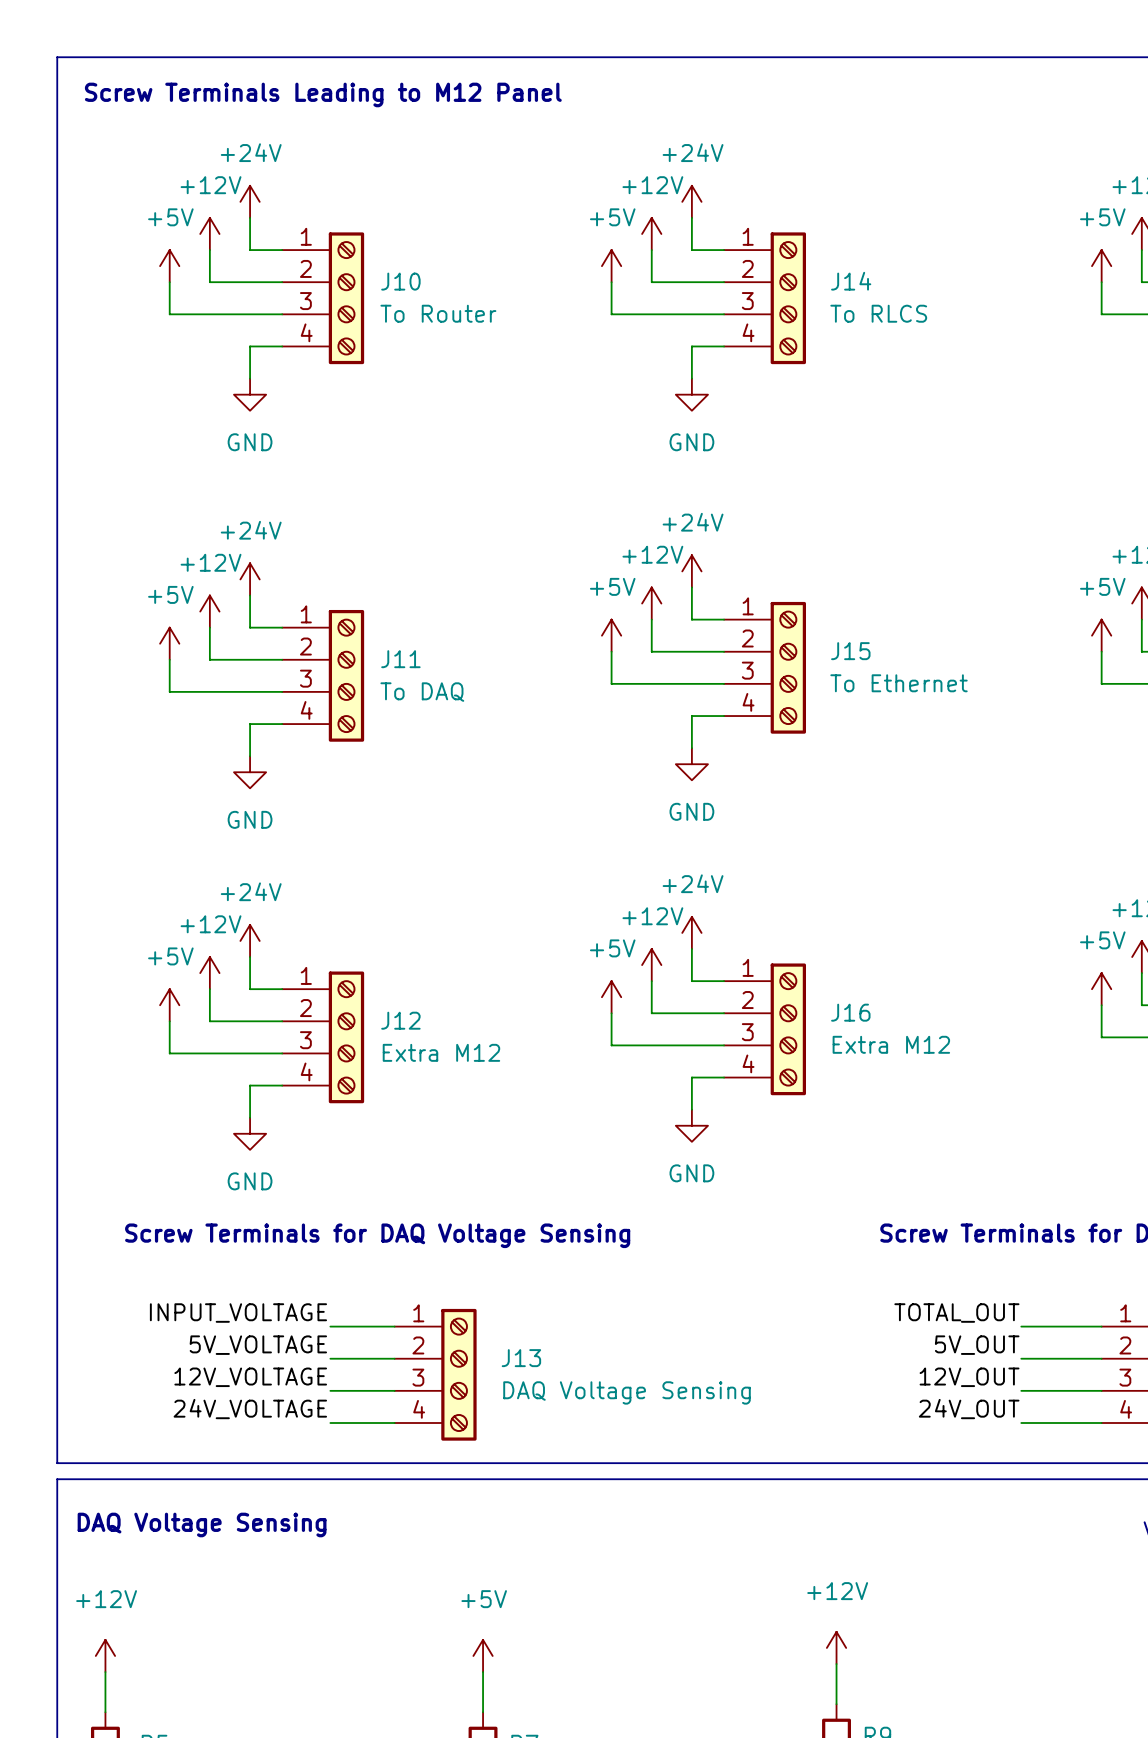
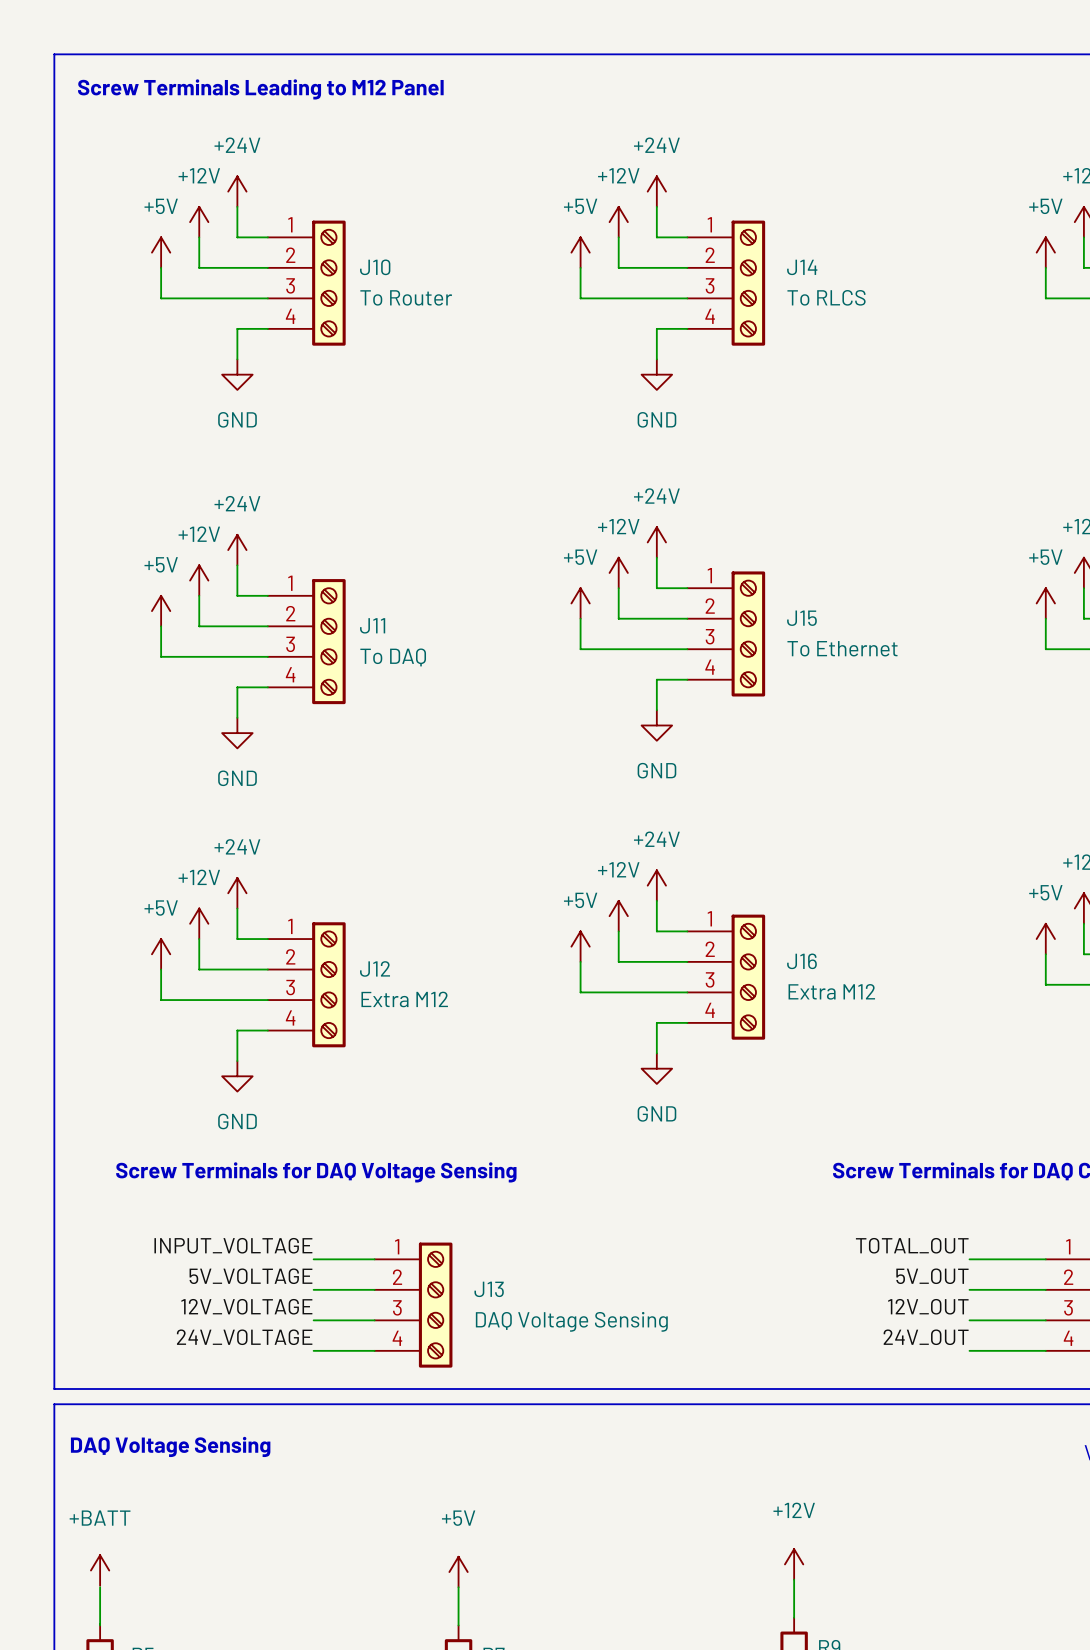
power symbol: +12V (105, 1655) -> +BATT (100, 1570)

